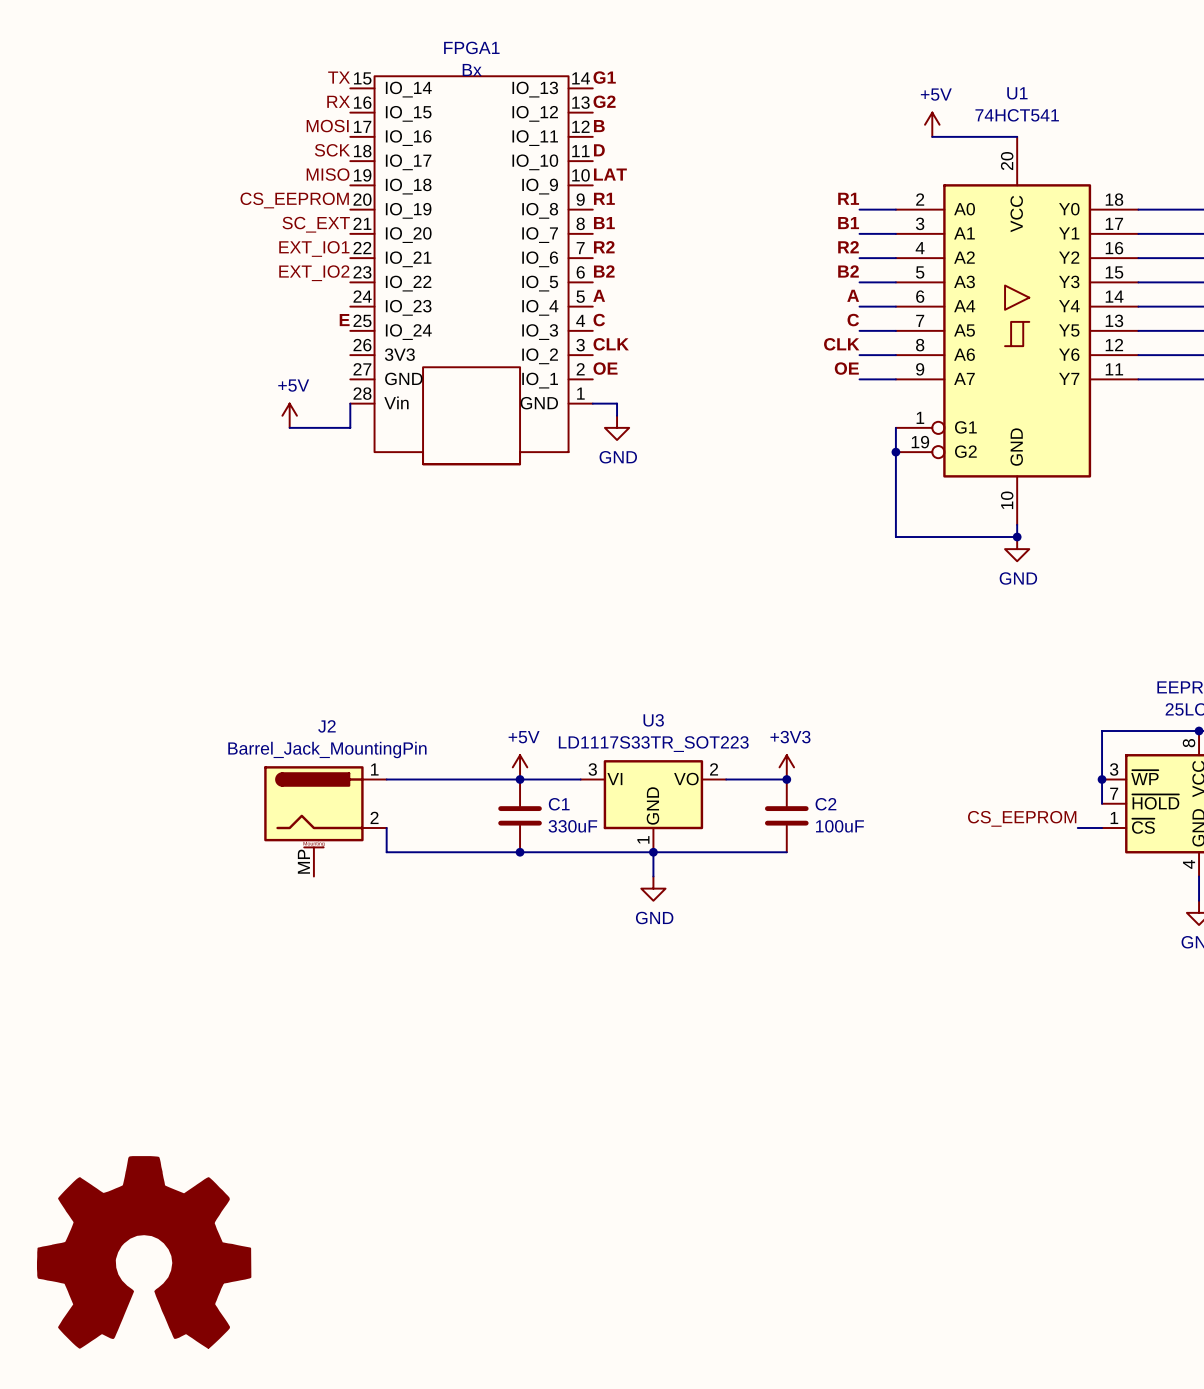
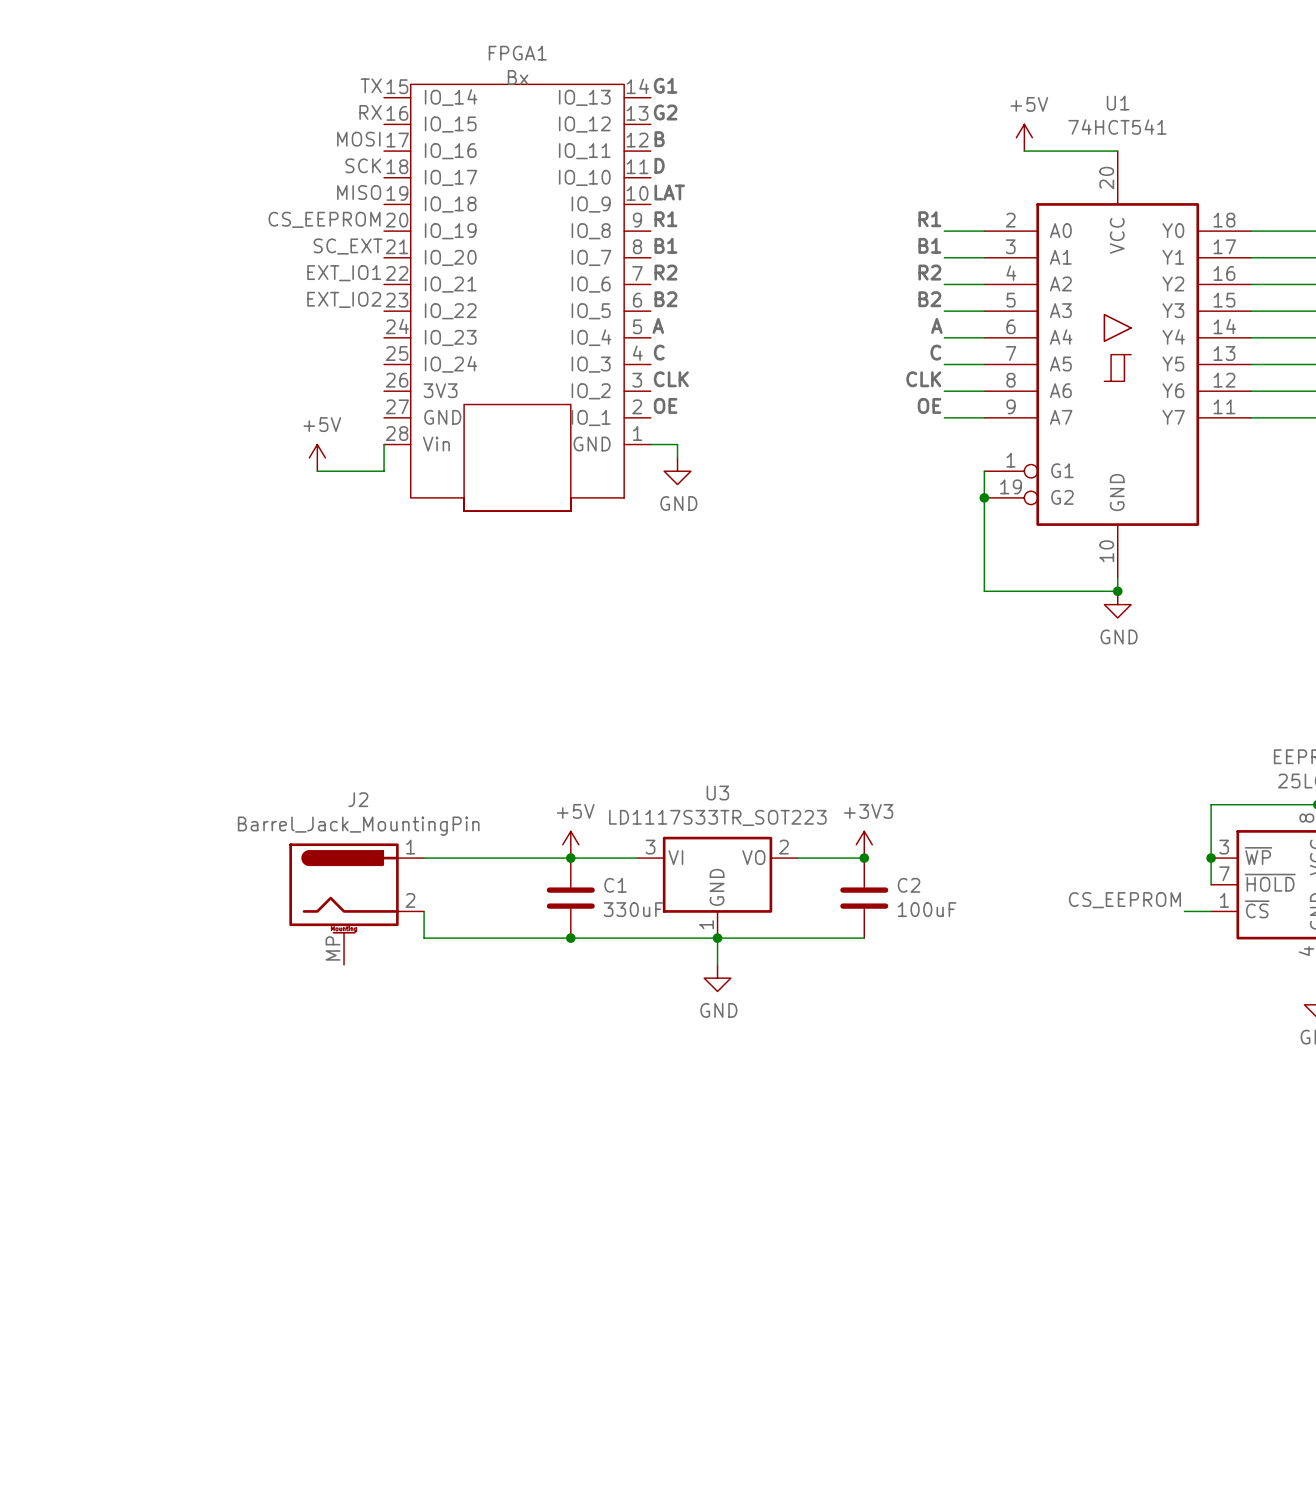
label: E (344, 320) -> none
part: (144, 1252) -> none

